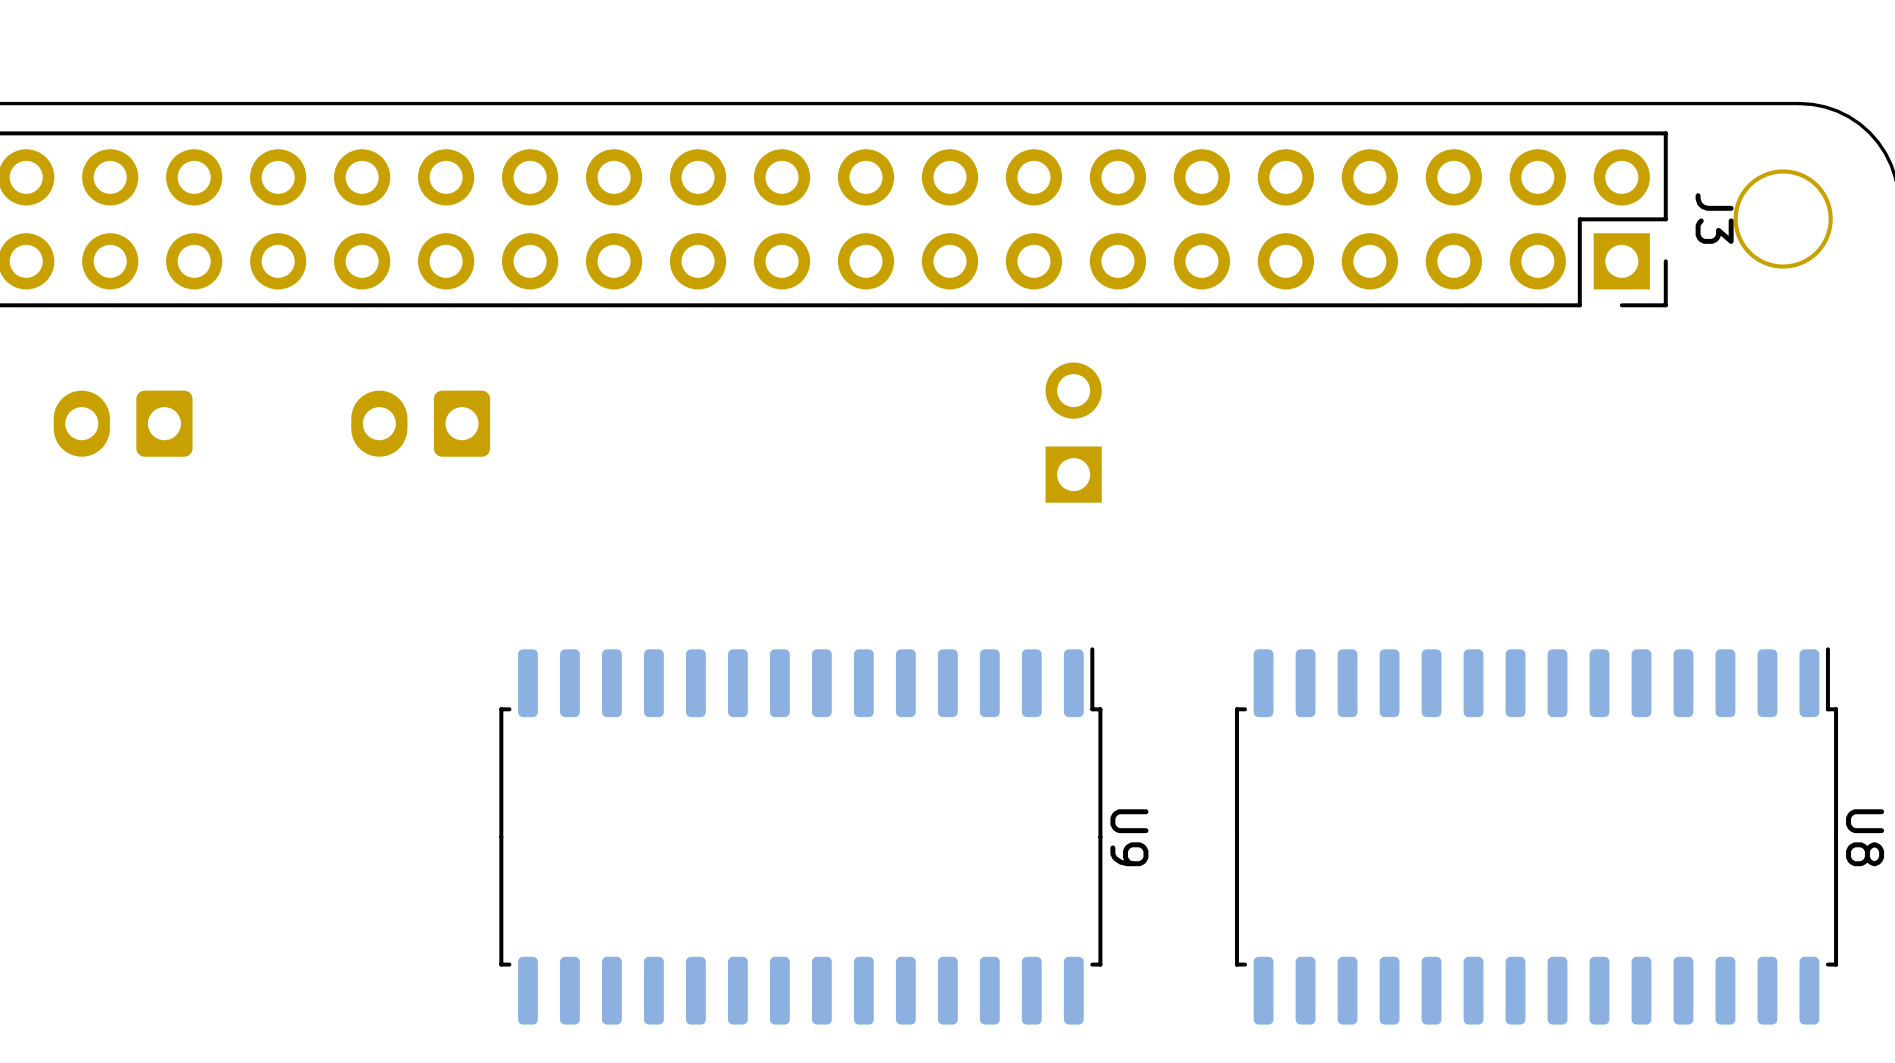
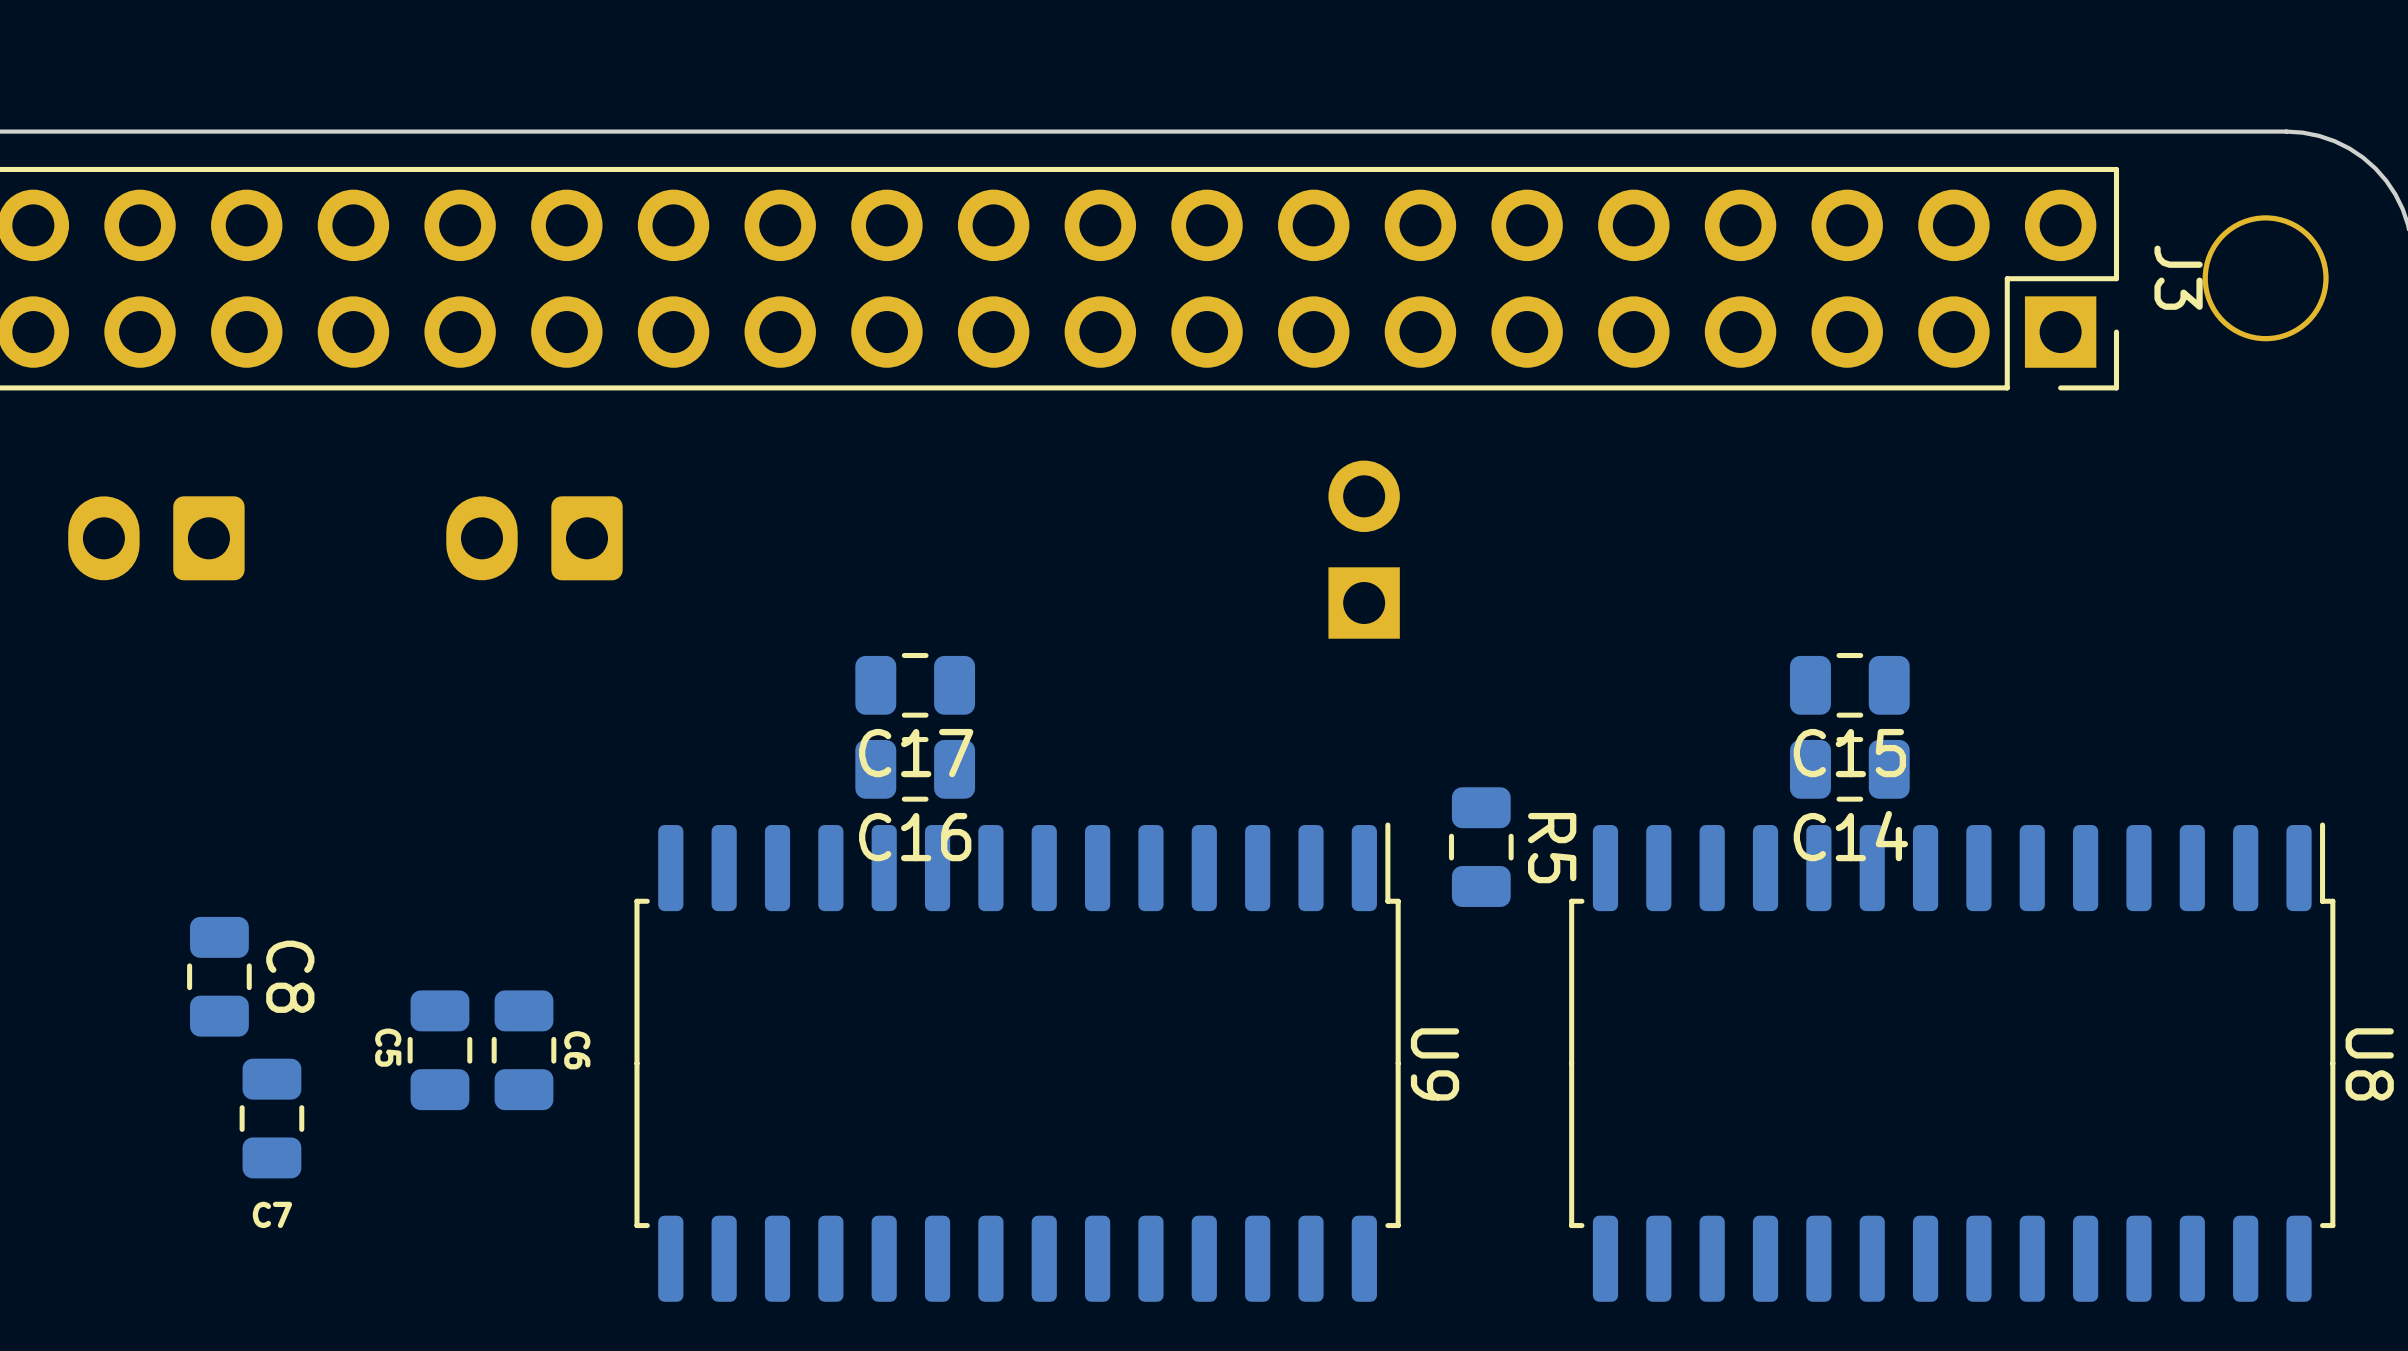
C17: none -> (915, 685)
C15: none -> (1849, 685)
C16: none -> (915, 769)
C14: none -> (1849, 769)
R5: none -> (1481, 847)
C8: none -> (219, 976)
C5: none -> (439, 1050)
C6: none -> (523, 1050)
C7: none -> (271, 1118)

